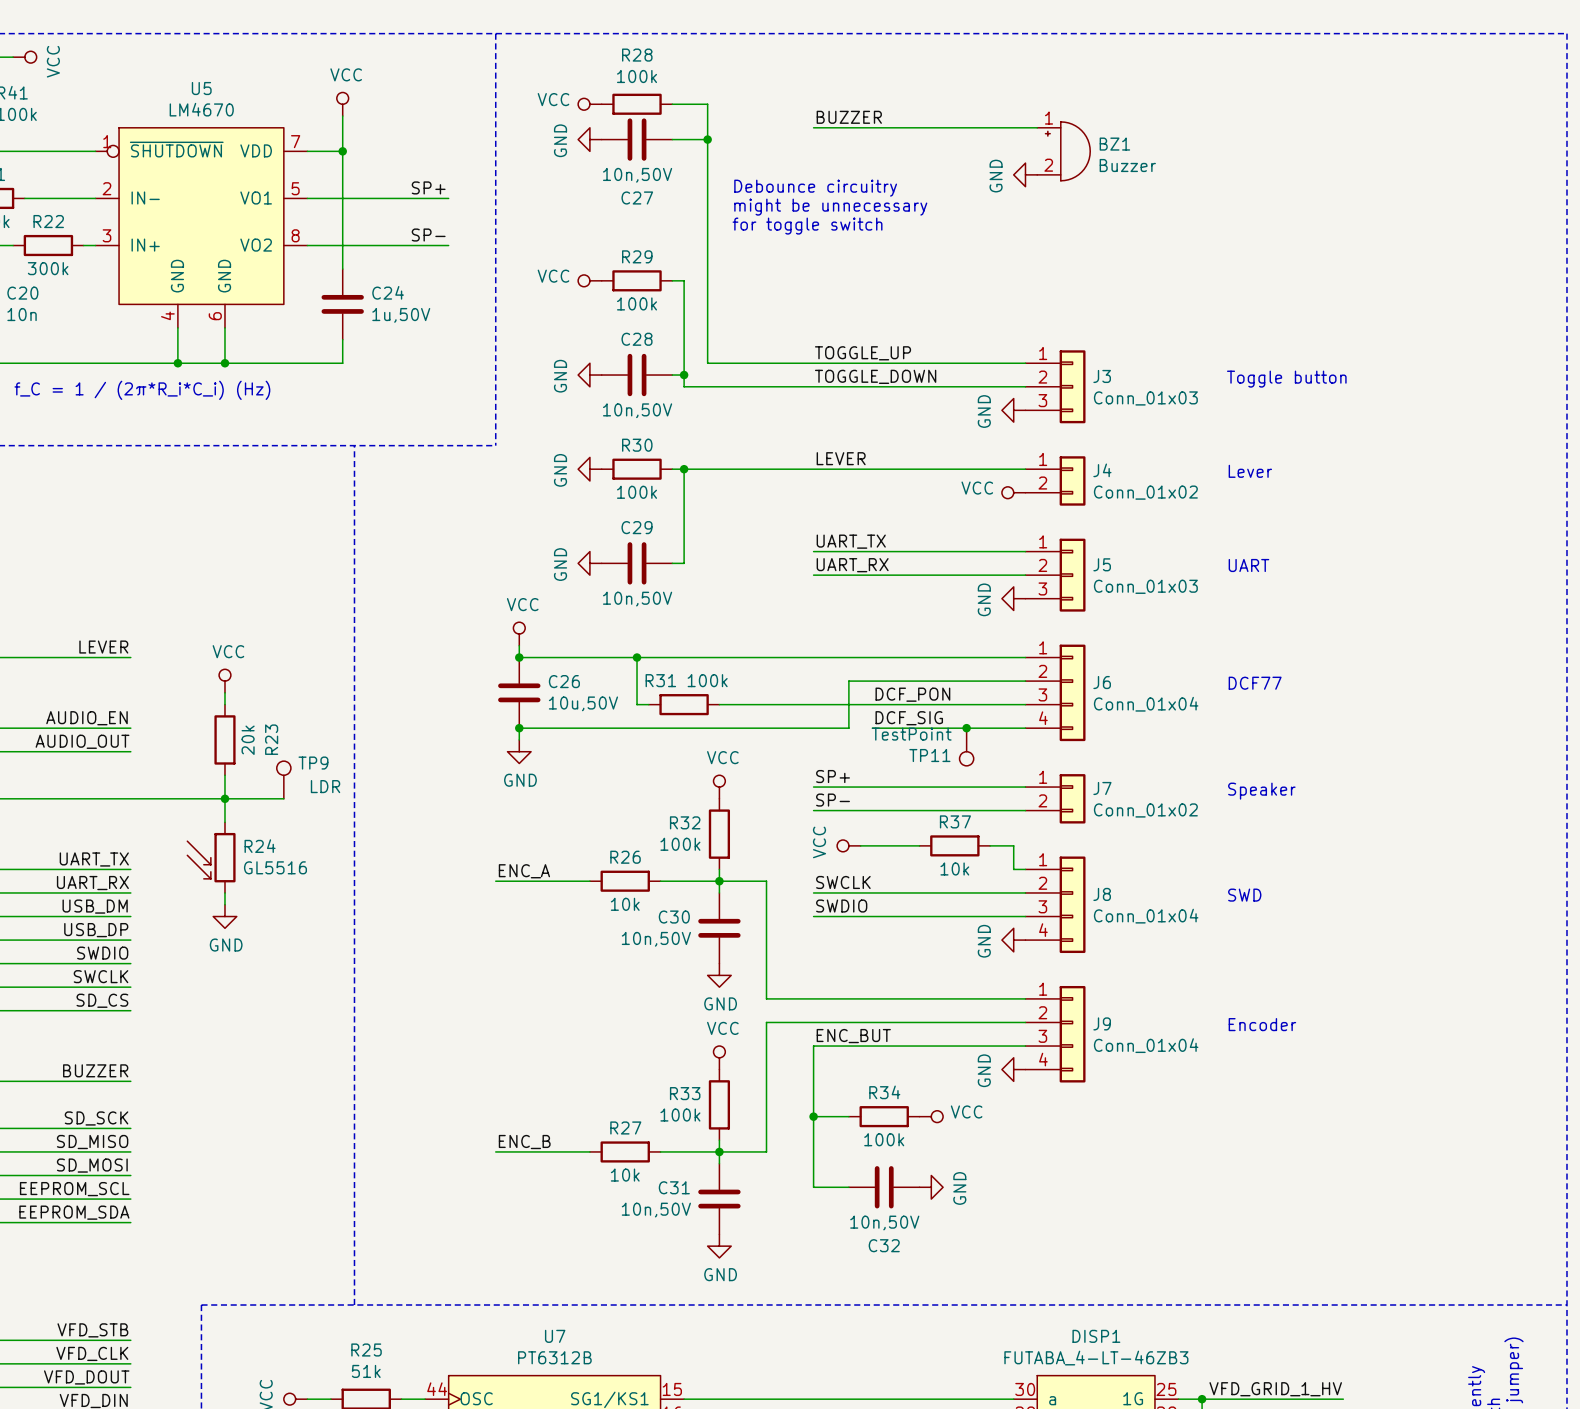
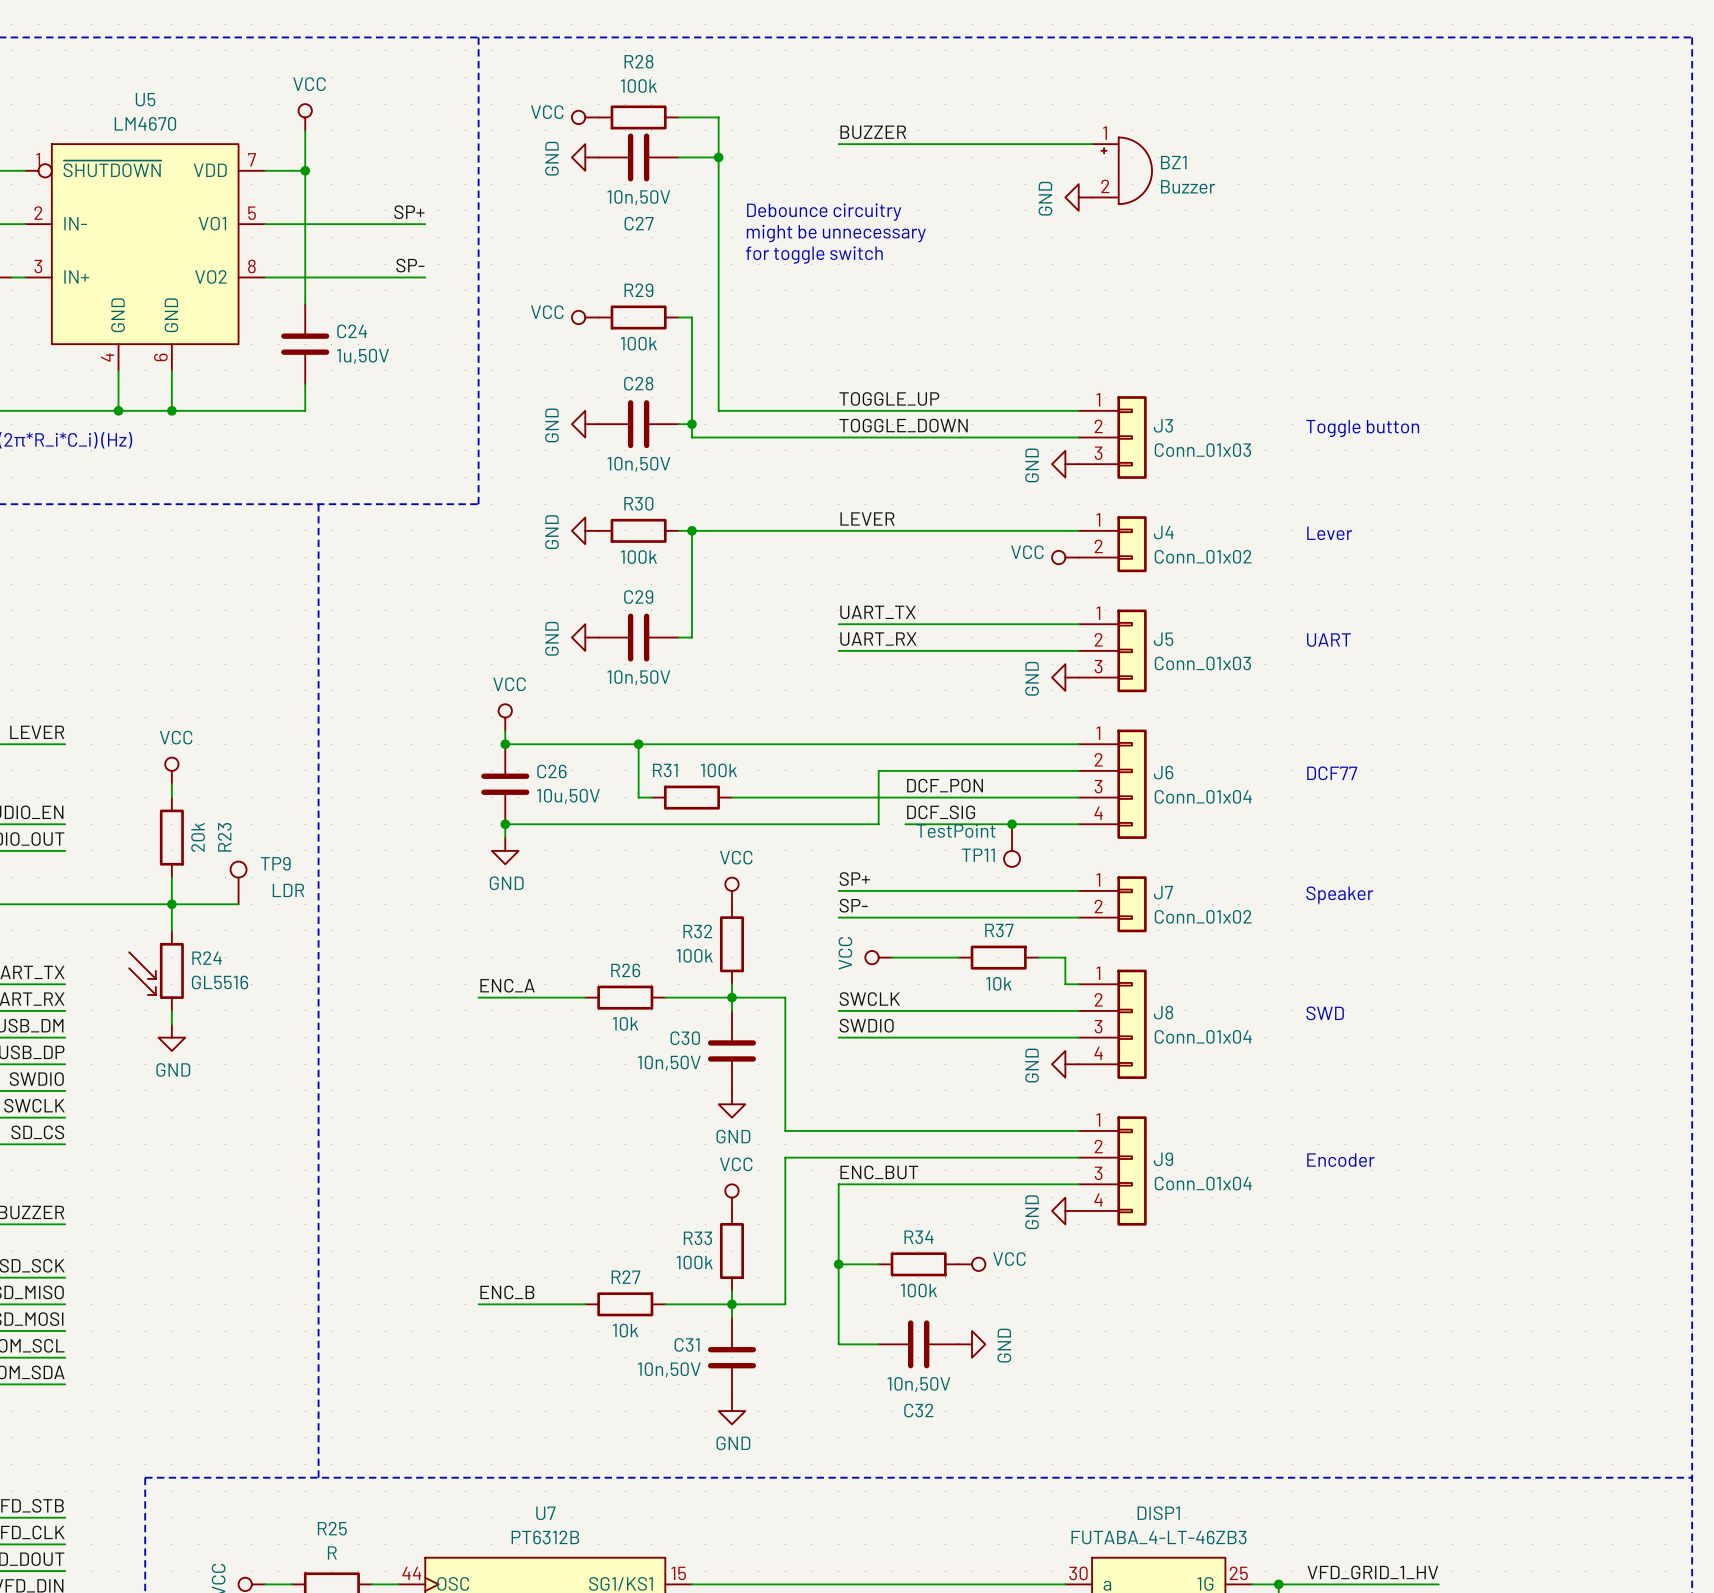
R25 value: 51k (366, 1371) -> R (332, 1552)

